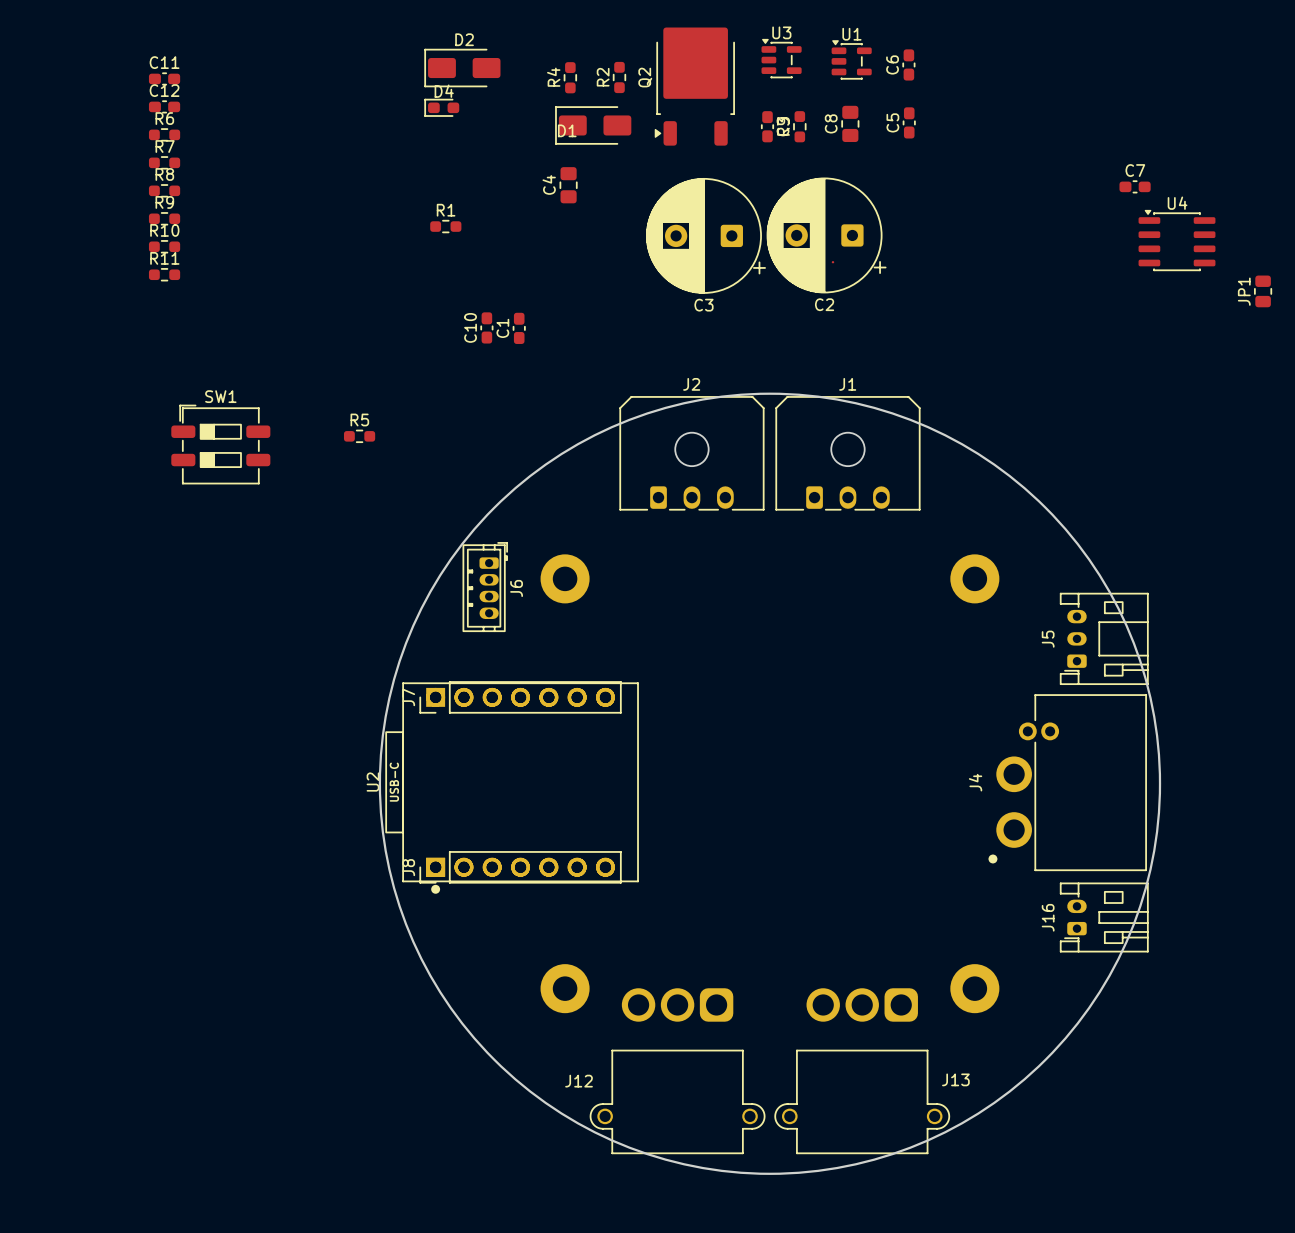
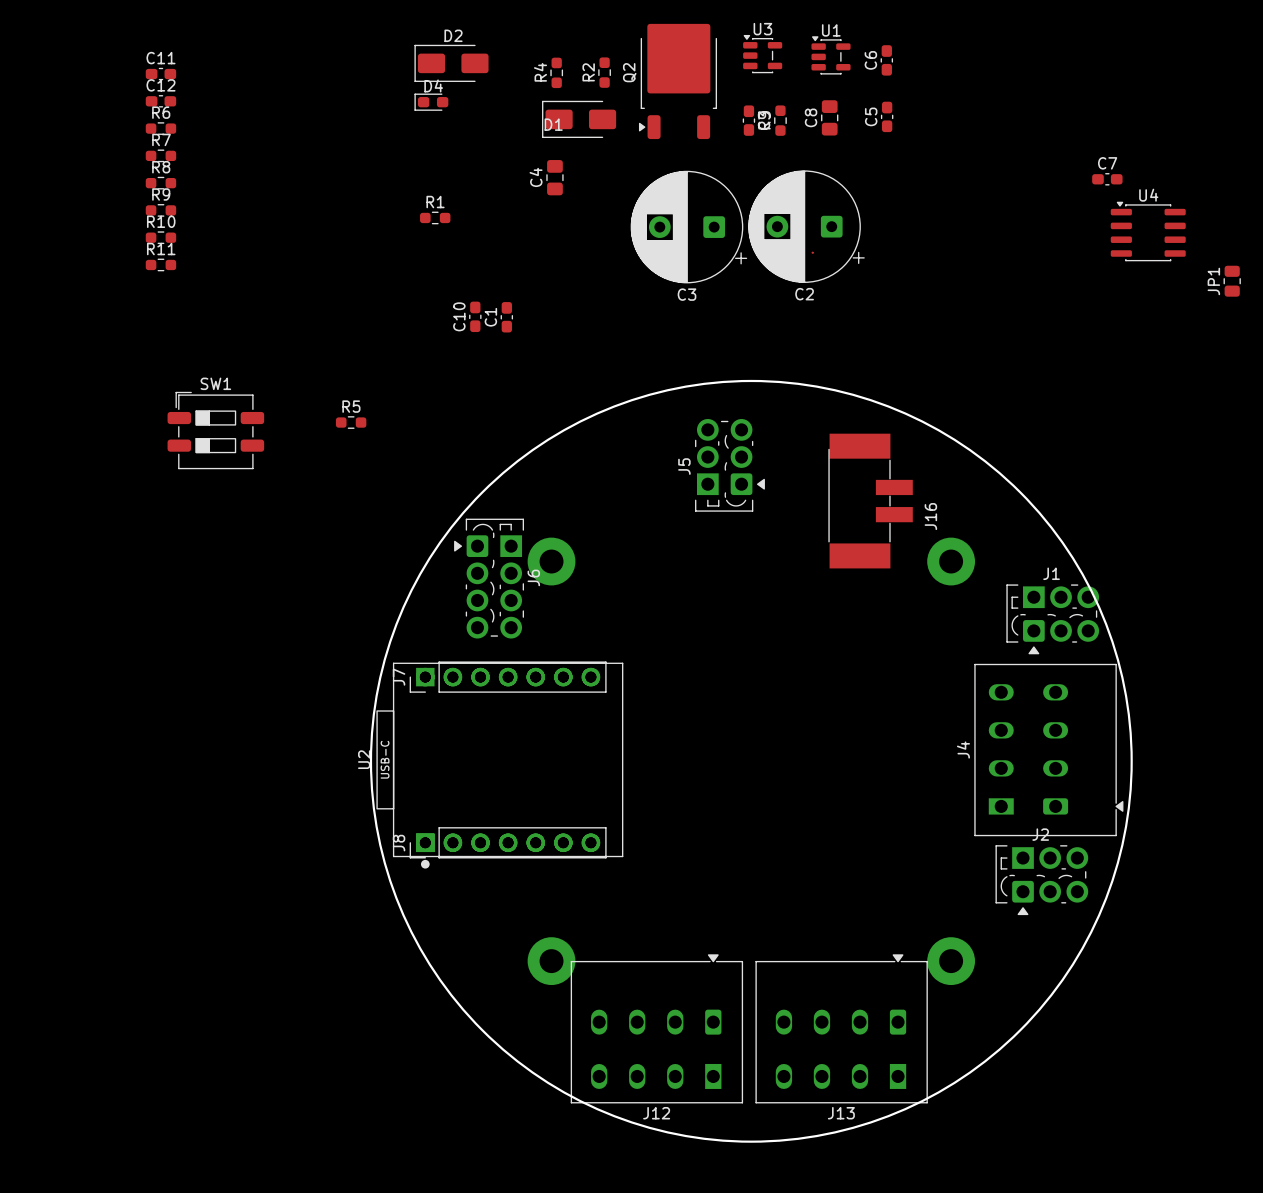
J2 footprint: [619, 396, 765, 511] -> [995, 845, 1089, 916]
J1 footprint: [775, 396, 921, 511] -> [1006, 584, 1100, 655]
J6 footprint: [462, 542, 508, 632] -> [454, 518, 524, 639]
J5 footprint: [1060, 592, 1149, 685] -> [695, 419, 765, 512]
J4 footprint: [988, 694, 1147, 871] -> [974, 663, 1124, 837]
J16 footprint: [1060, 882, 1149, 953] -> [828, 433, 913, 569]
J16 name position: J16 (1048, 917) -> J16 (930, 516)
J12 footprint: [589, 988, 766, 1154] -> [570, 954, 744, 1104]
J13 footprint: [774, 988, 950, 1154] -> [755, 954, 928, 1104]
J13 name position: J13 (955, 1079) -> J13 (841, 1113)
J12 name position: J12 (579, 1081) -> J12 (656, 1113)

